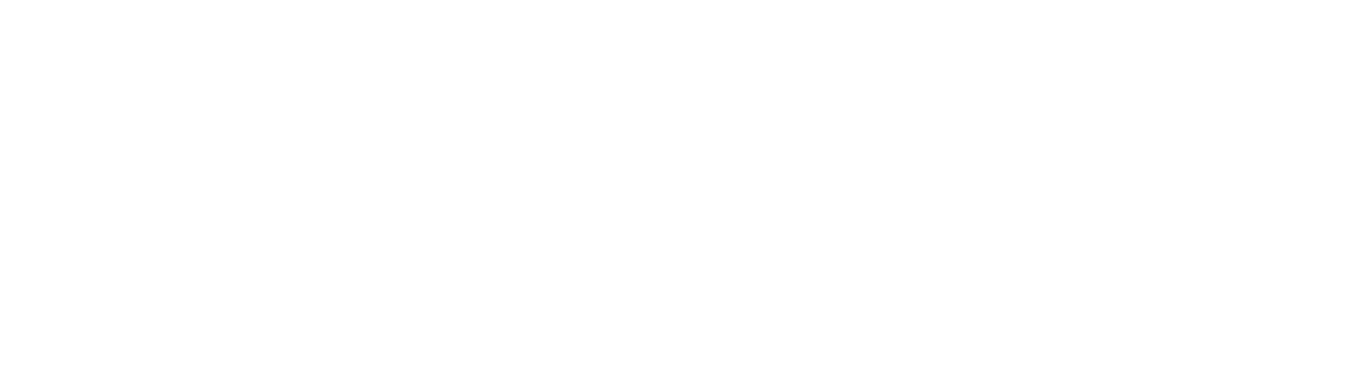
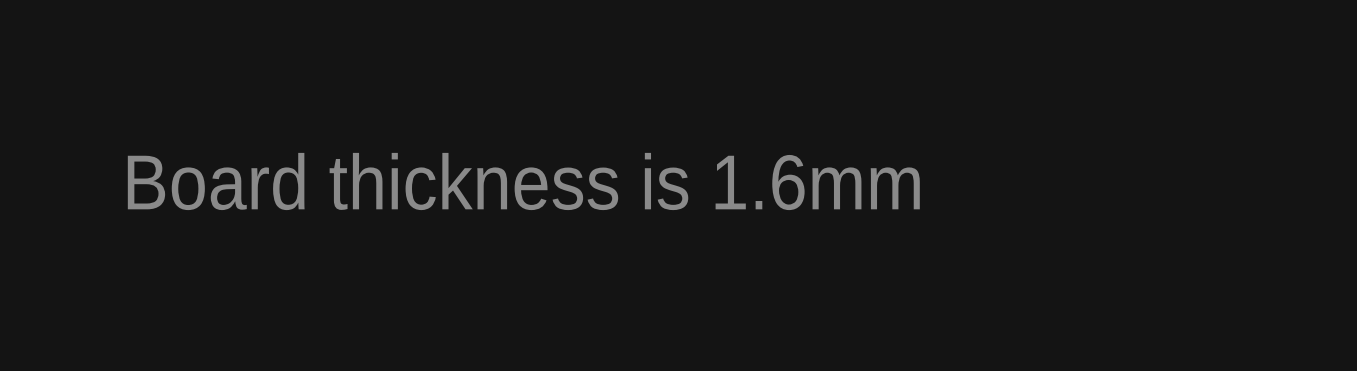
text: none -> Board thickness is 1.6mm (523, 181)

